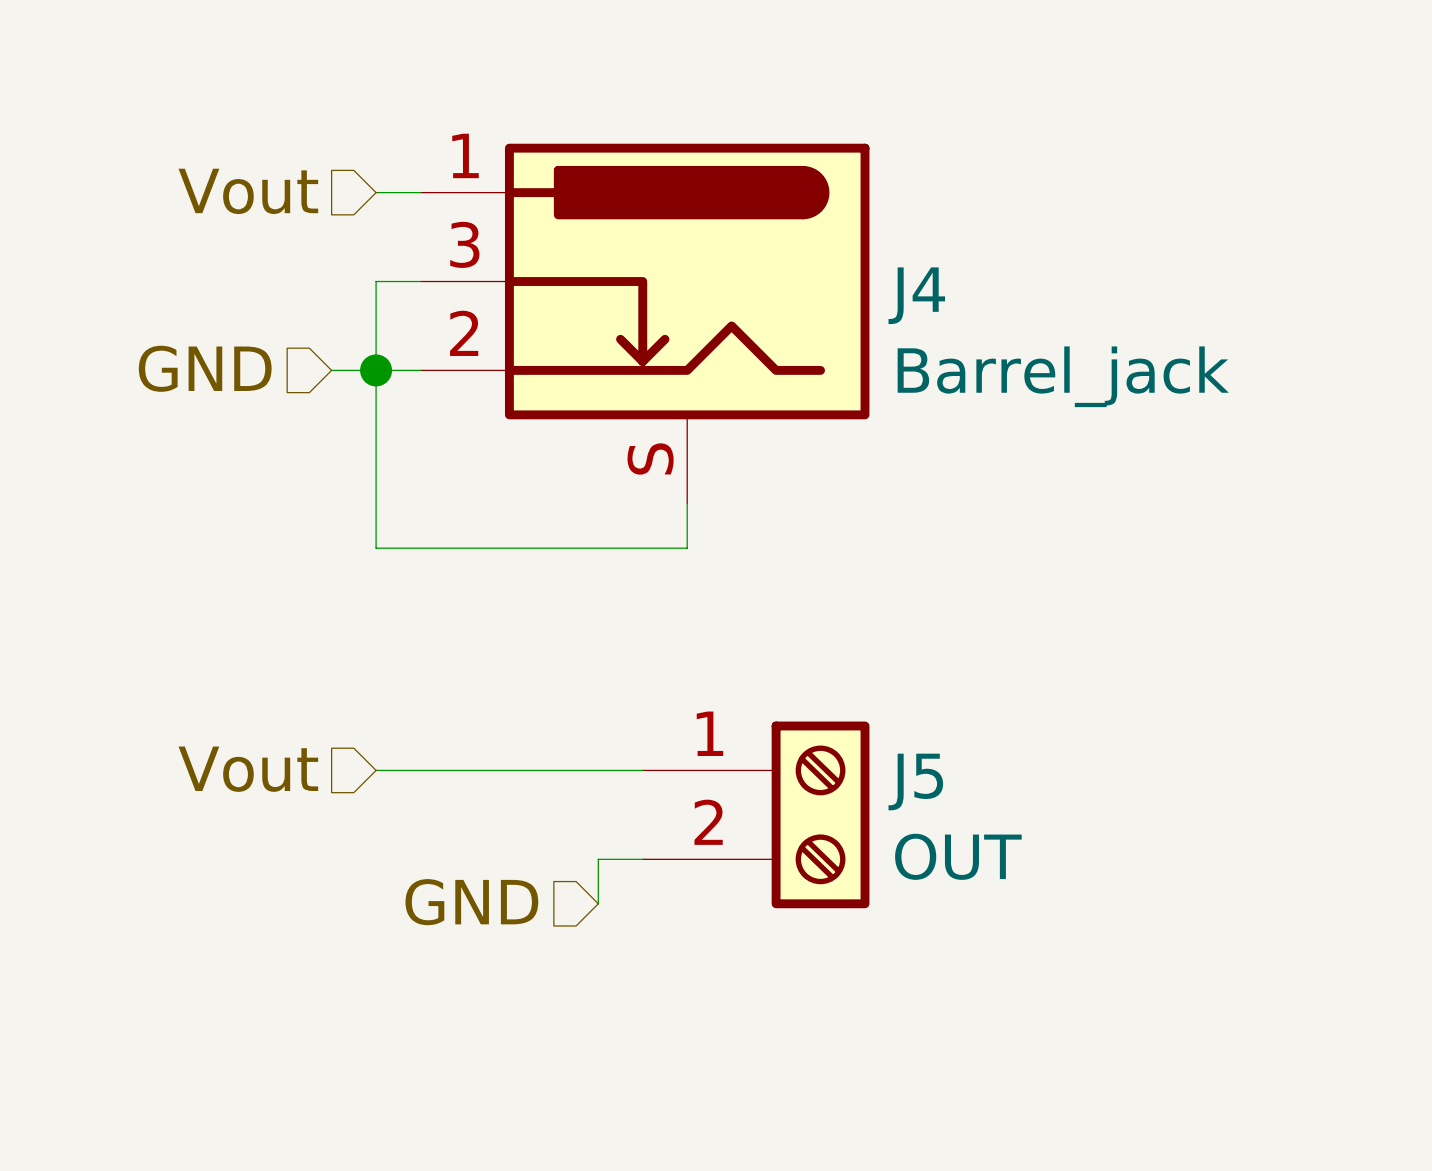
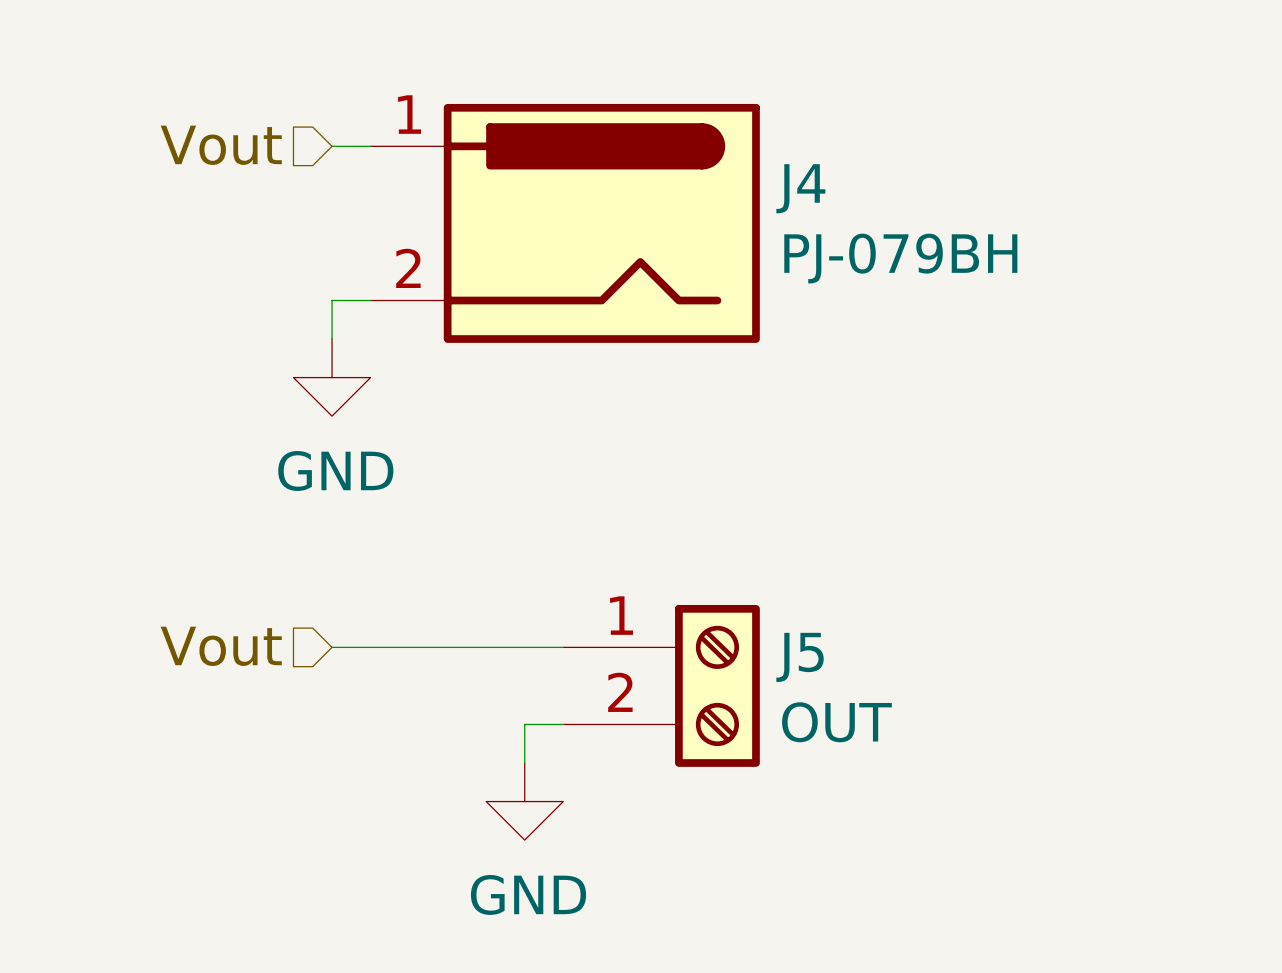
J4 symbol: [420, 143, 870, 504] -> [370, 103, 760, 343]
wire: (420, 281) (376, 281) (376, 370) (331, 370) -> none
hierarchical label: GND (205, 368) -> none
junction: (376, 370) -> none
J4 value: Barrel_jack (1063, 376) -> PJ-079BH (900, 258)
wire: (376, 414) (376, 548) (687, 548) (687, 503) -> none
power symbol: none -> GND (332, 377)
hierarchical label: GND (471, 902) -> none
power symbol: none -> GND (524, 801)

